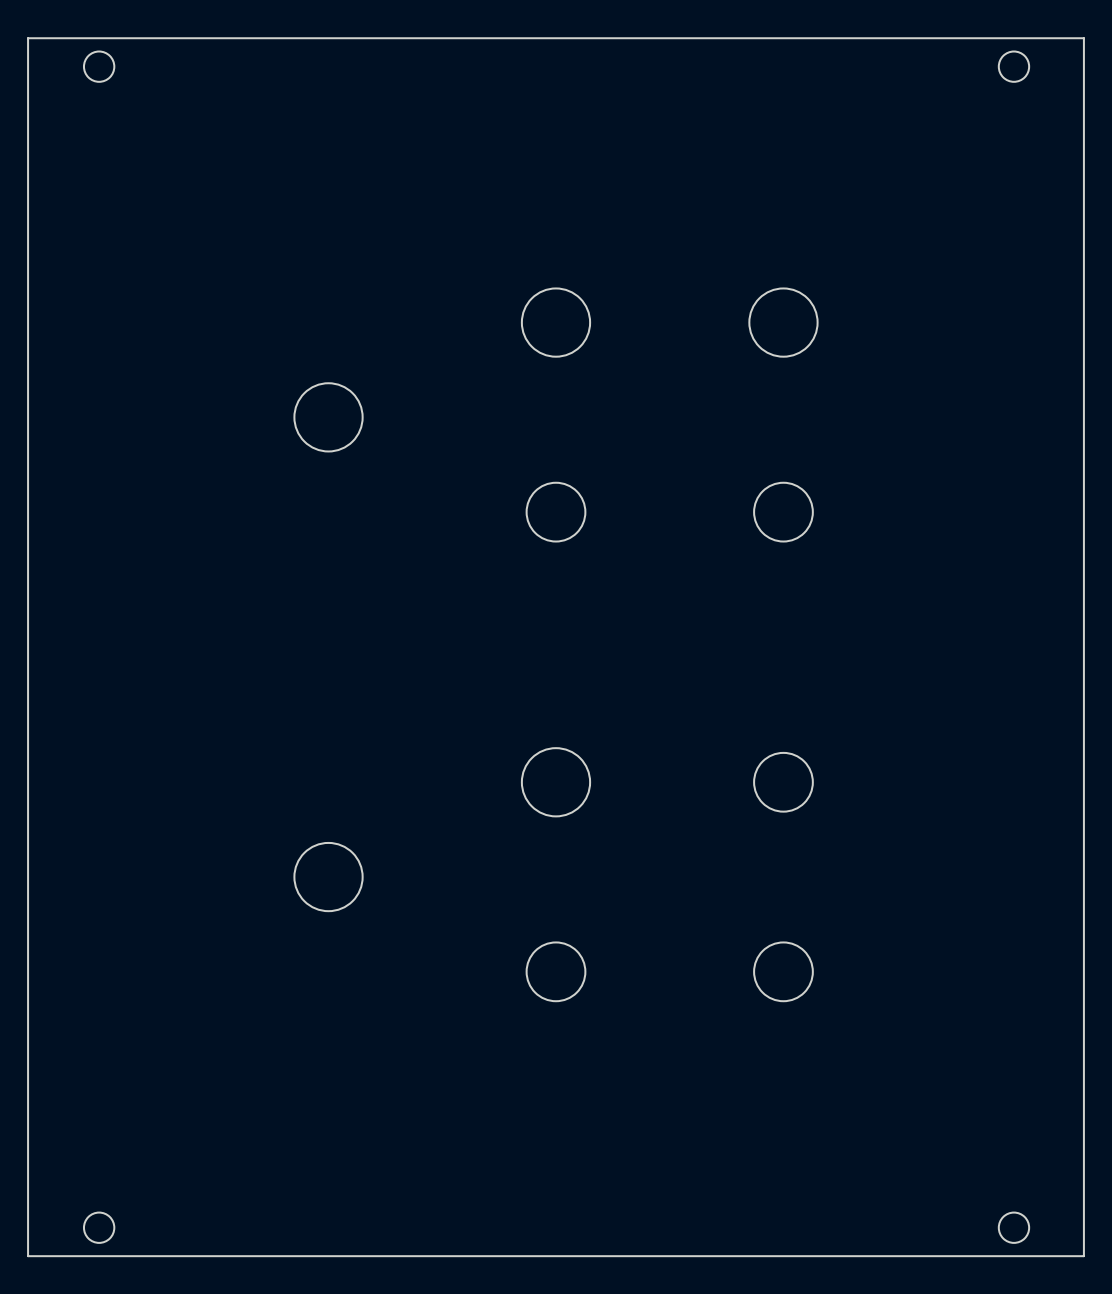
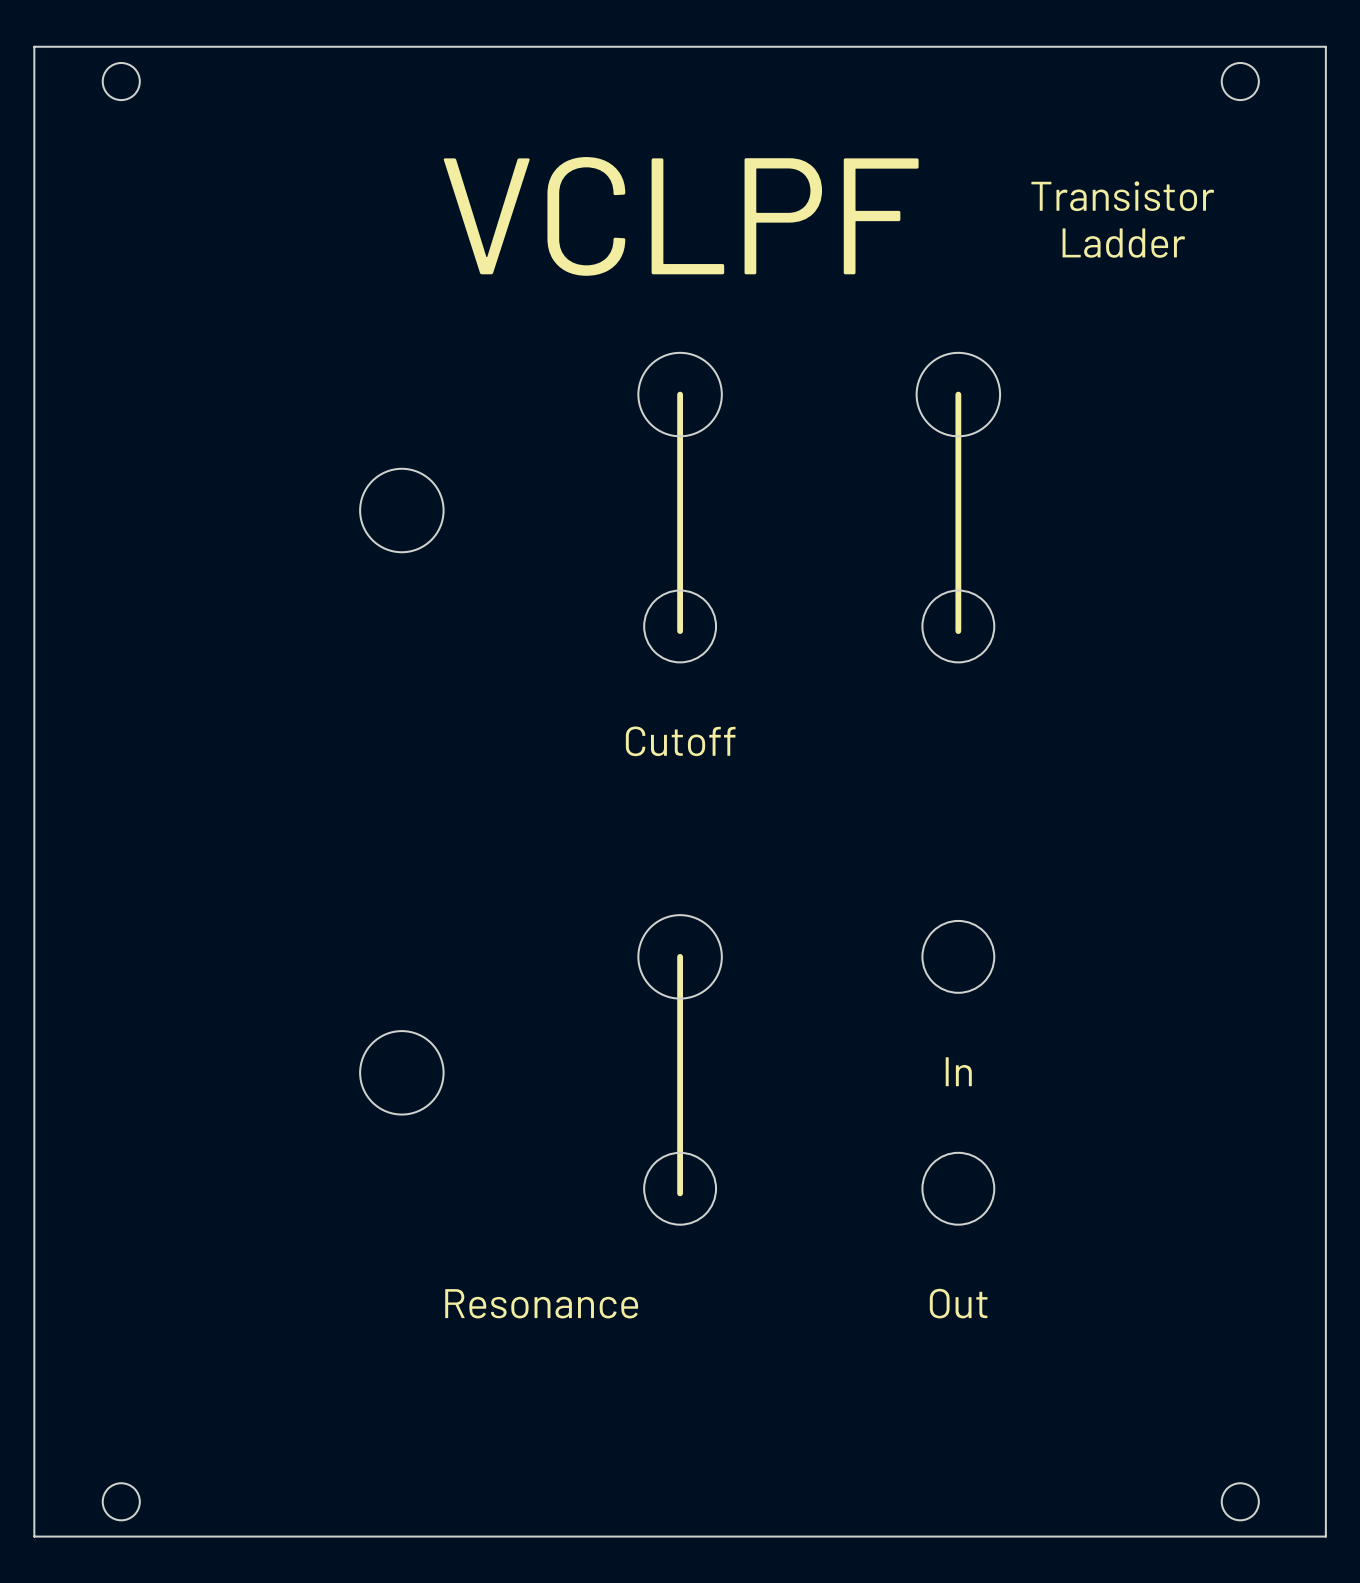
text: none -> Transistor (1122, 196)
text: none -> VCLPF (681, 216)
text: none -> Ladder (1123, 243)
line: none -> (680, 394) (680, 631)
line: none -> (958, 394) (958, 631)
text: none -> Cutoff (680, 741)
line: none -> (680, 956) (680, 1193)
text: none -> In (958, 1071)
text: none -> Resonance (541, 1303)
text: none -> Out (958, 1303)

